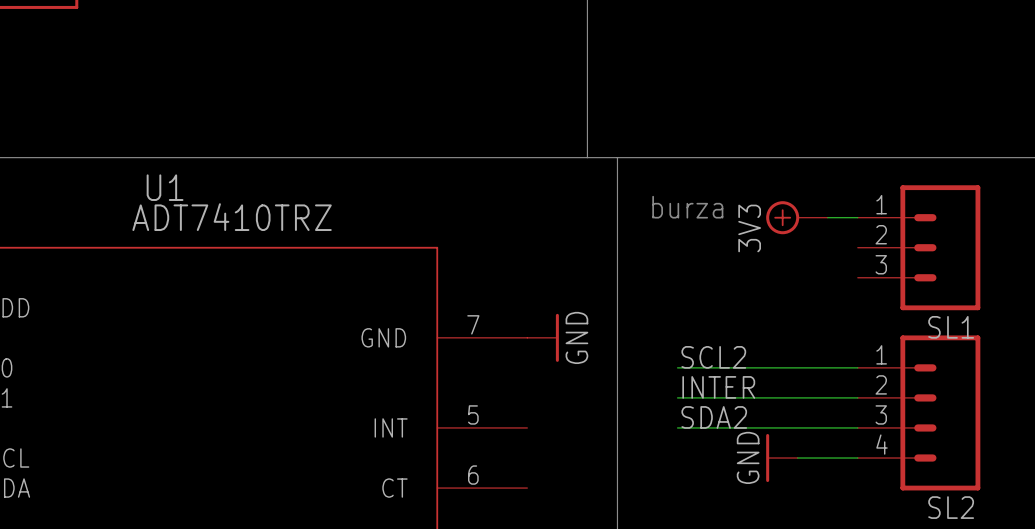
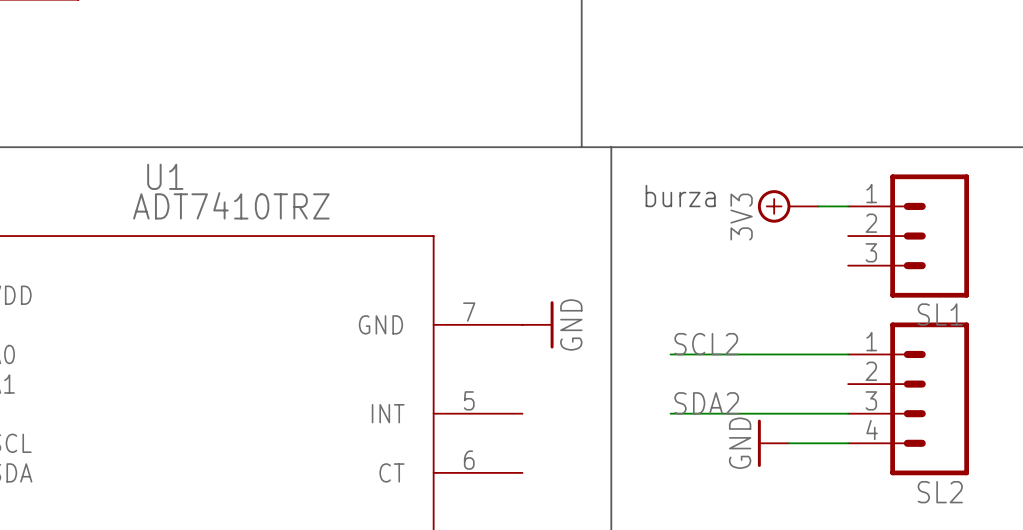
label: INTER (718, 387) -> none
wire: (677, 397) (857, 397) -> none

